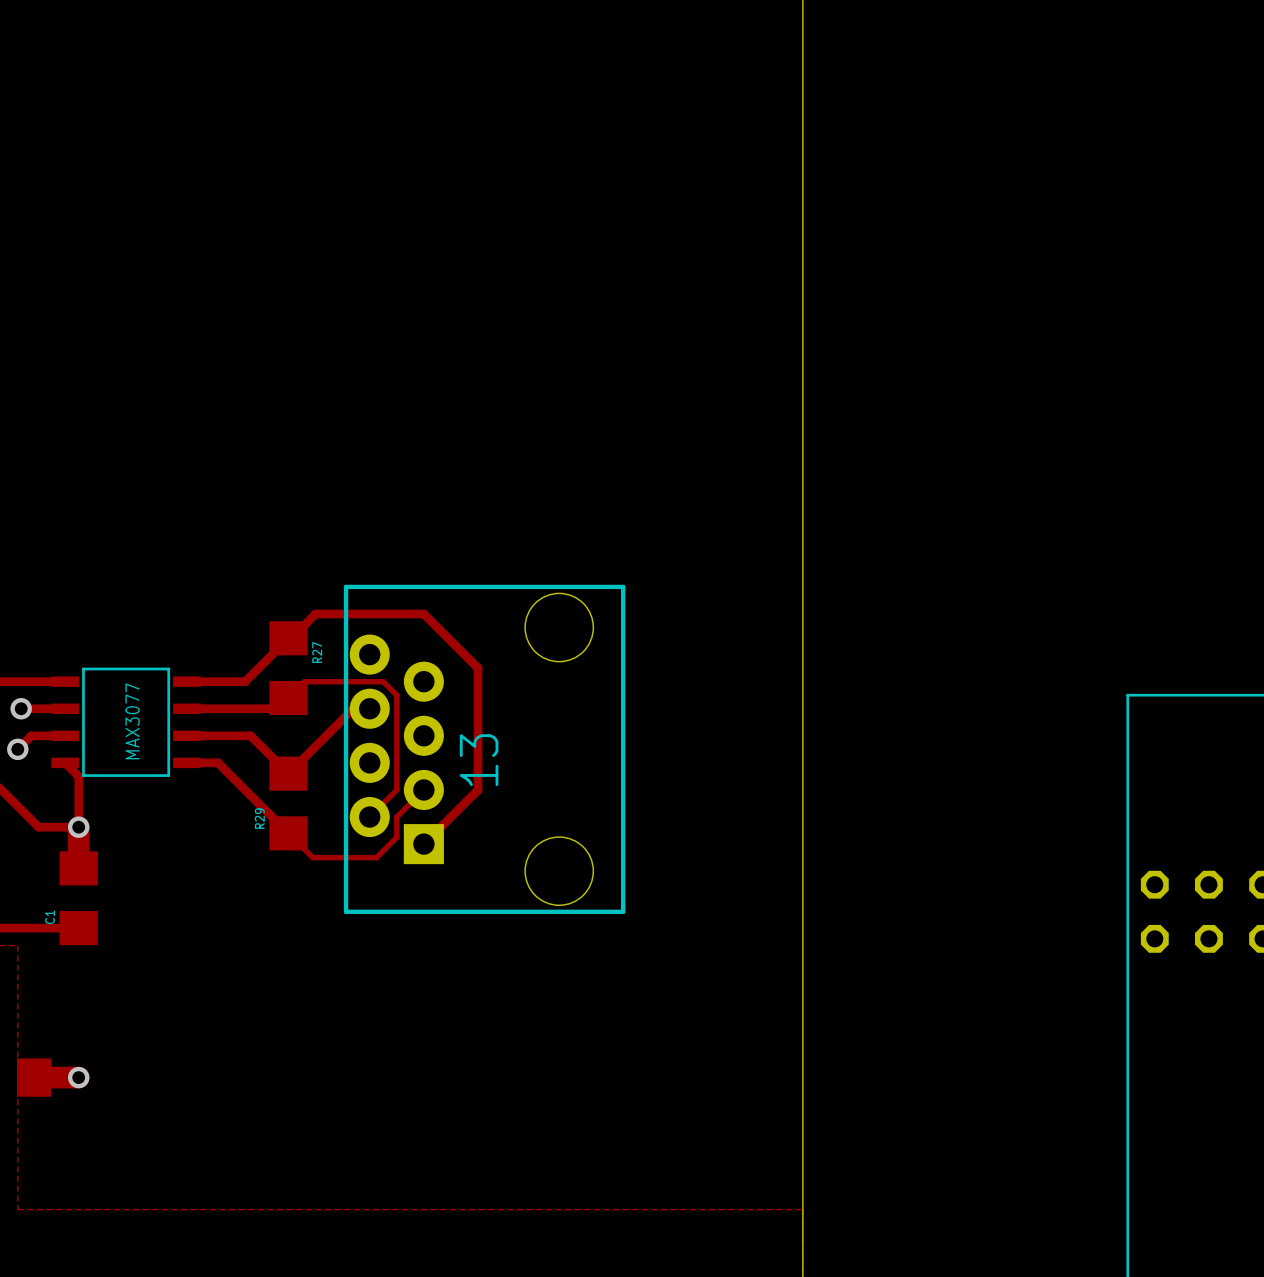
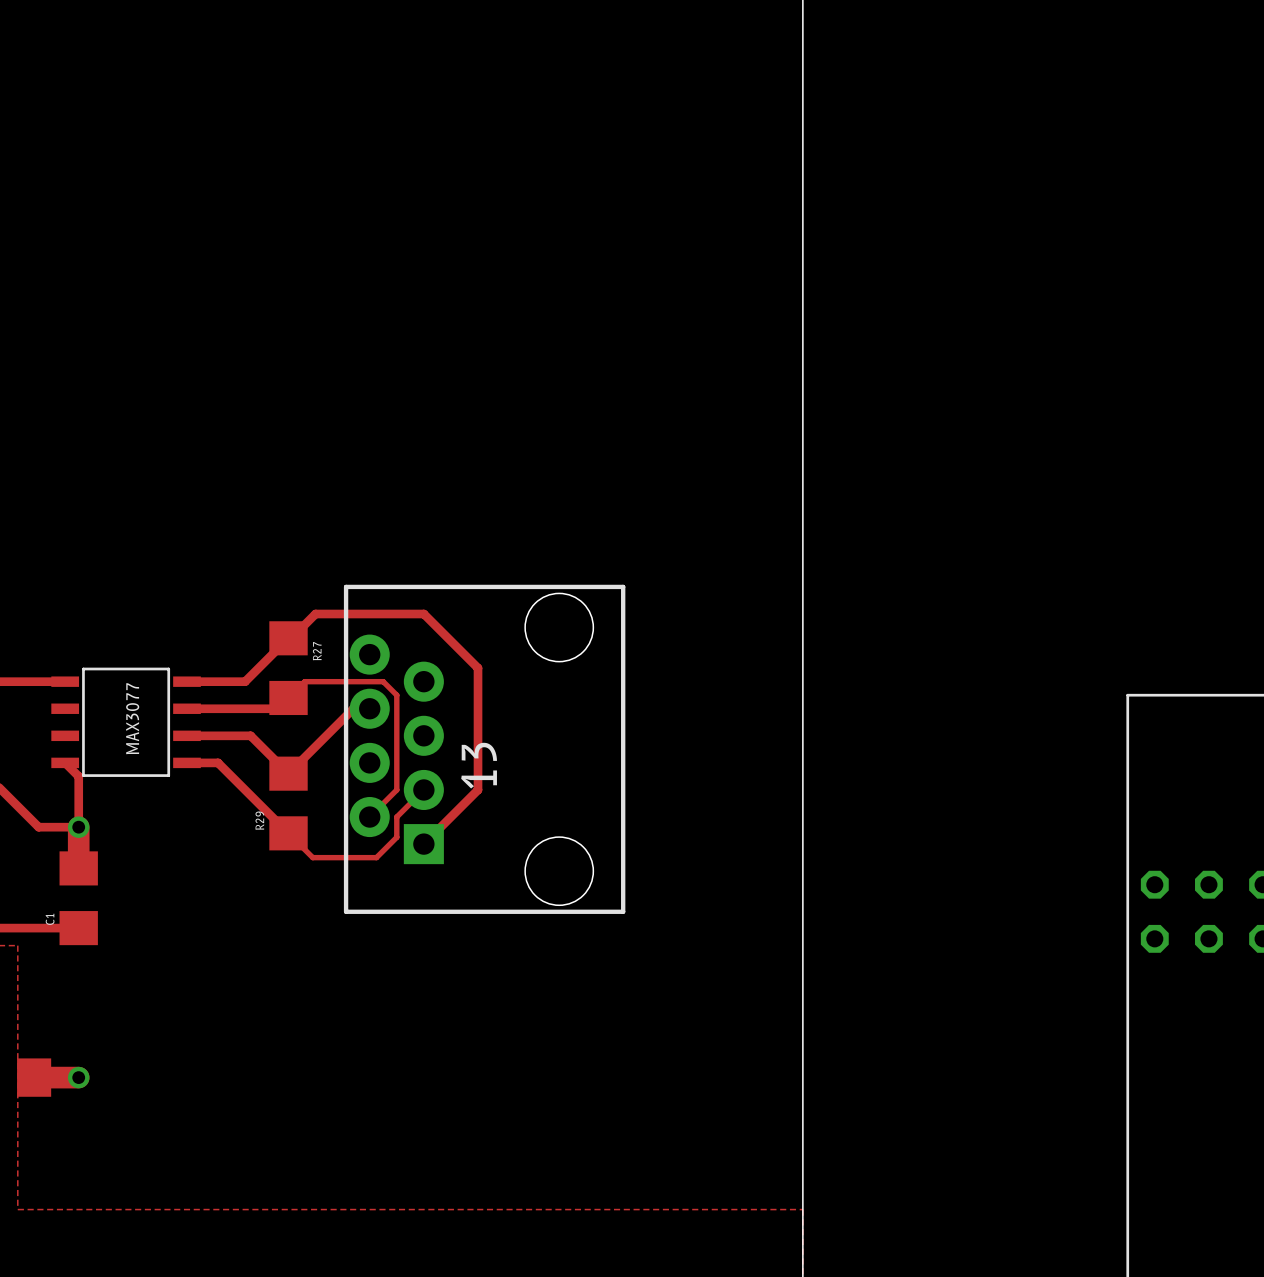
track: (21, 708) (65, 708) -> none
via: (21, 708) -> none
track: (65, 735) (31, 735) (17, 749) -> none
via: (17, 749) -> none

